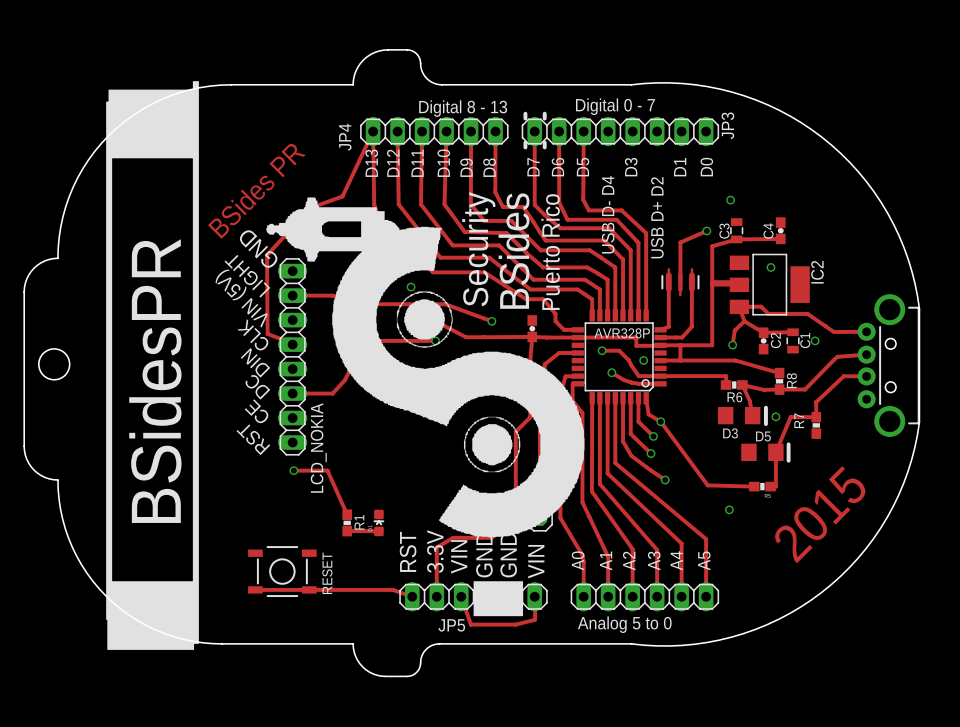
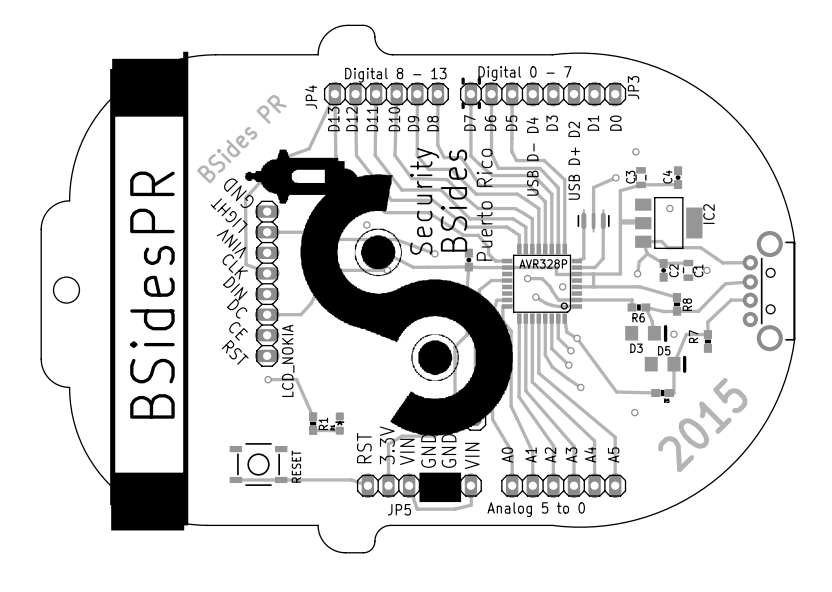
text: VIN (5V) (241, 298) -> VINV (231, 244)
text rotation: 0° (253, 334) -> 180° (235, 266)
text rotation: 0° (255, 362) -> 180° (235, 288)
text rotation: 0° (257, 387) -> 180° (237, 308)
text rotation: 0° (256, 411) -> 180° (238, 331)
text rotation: 0° (253, 439) -> 180° (235, 352)

